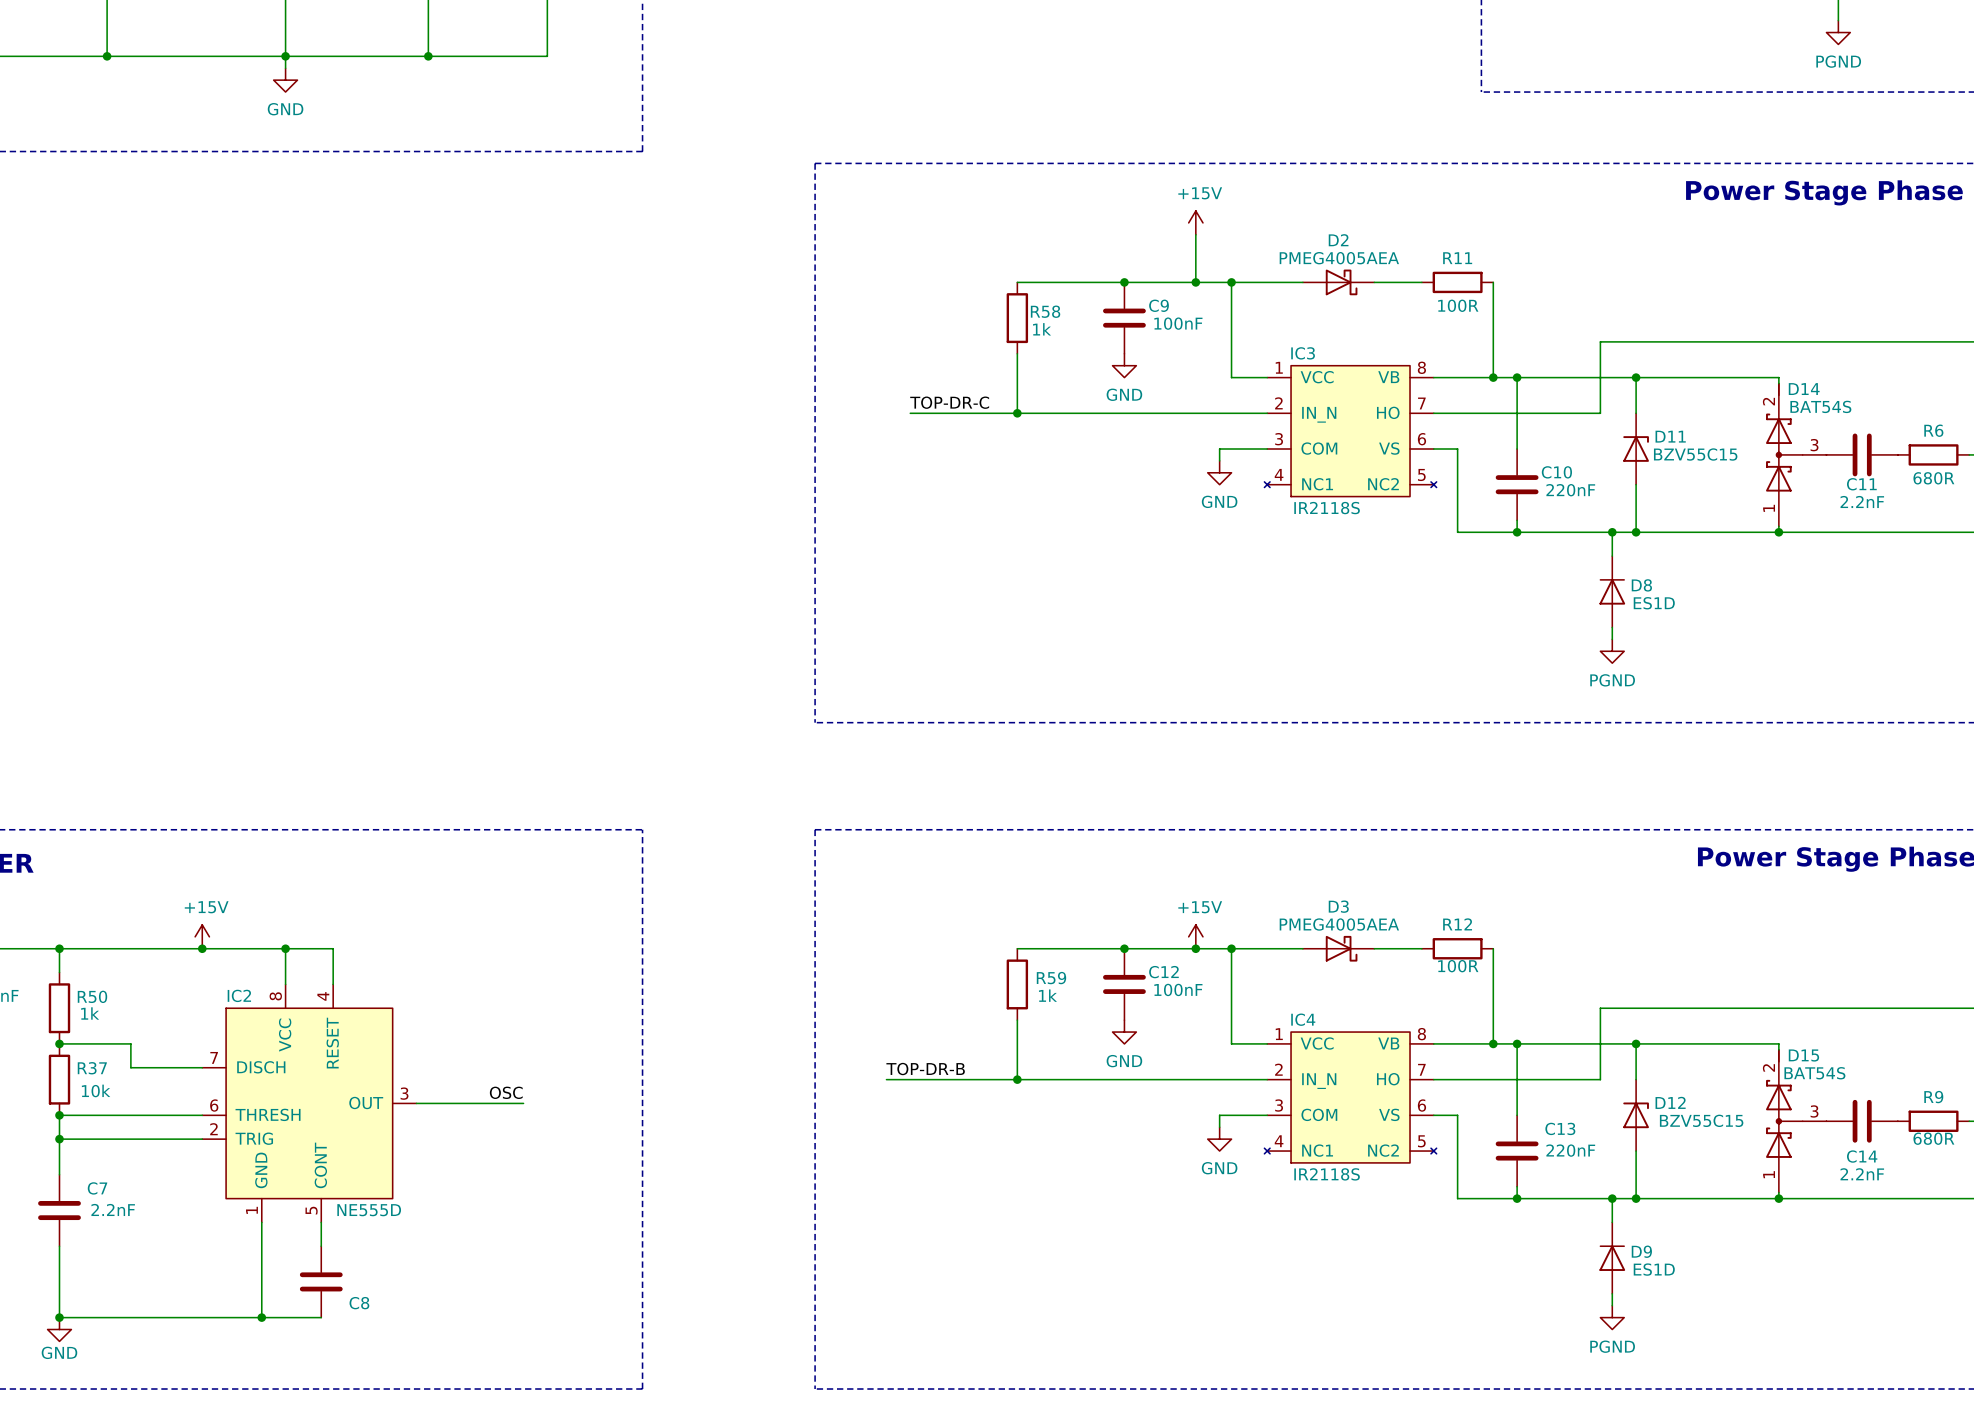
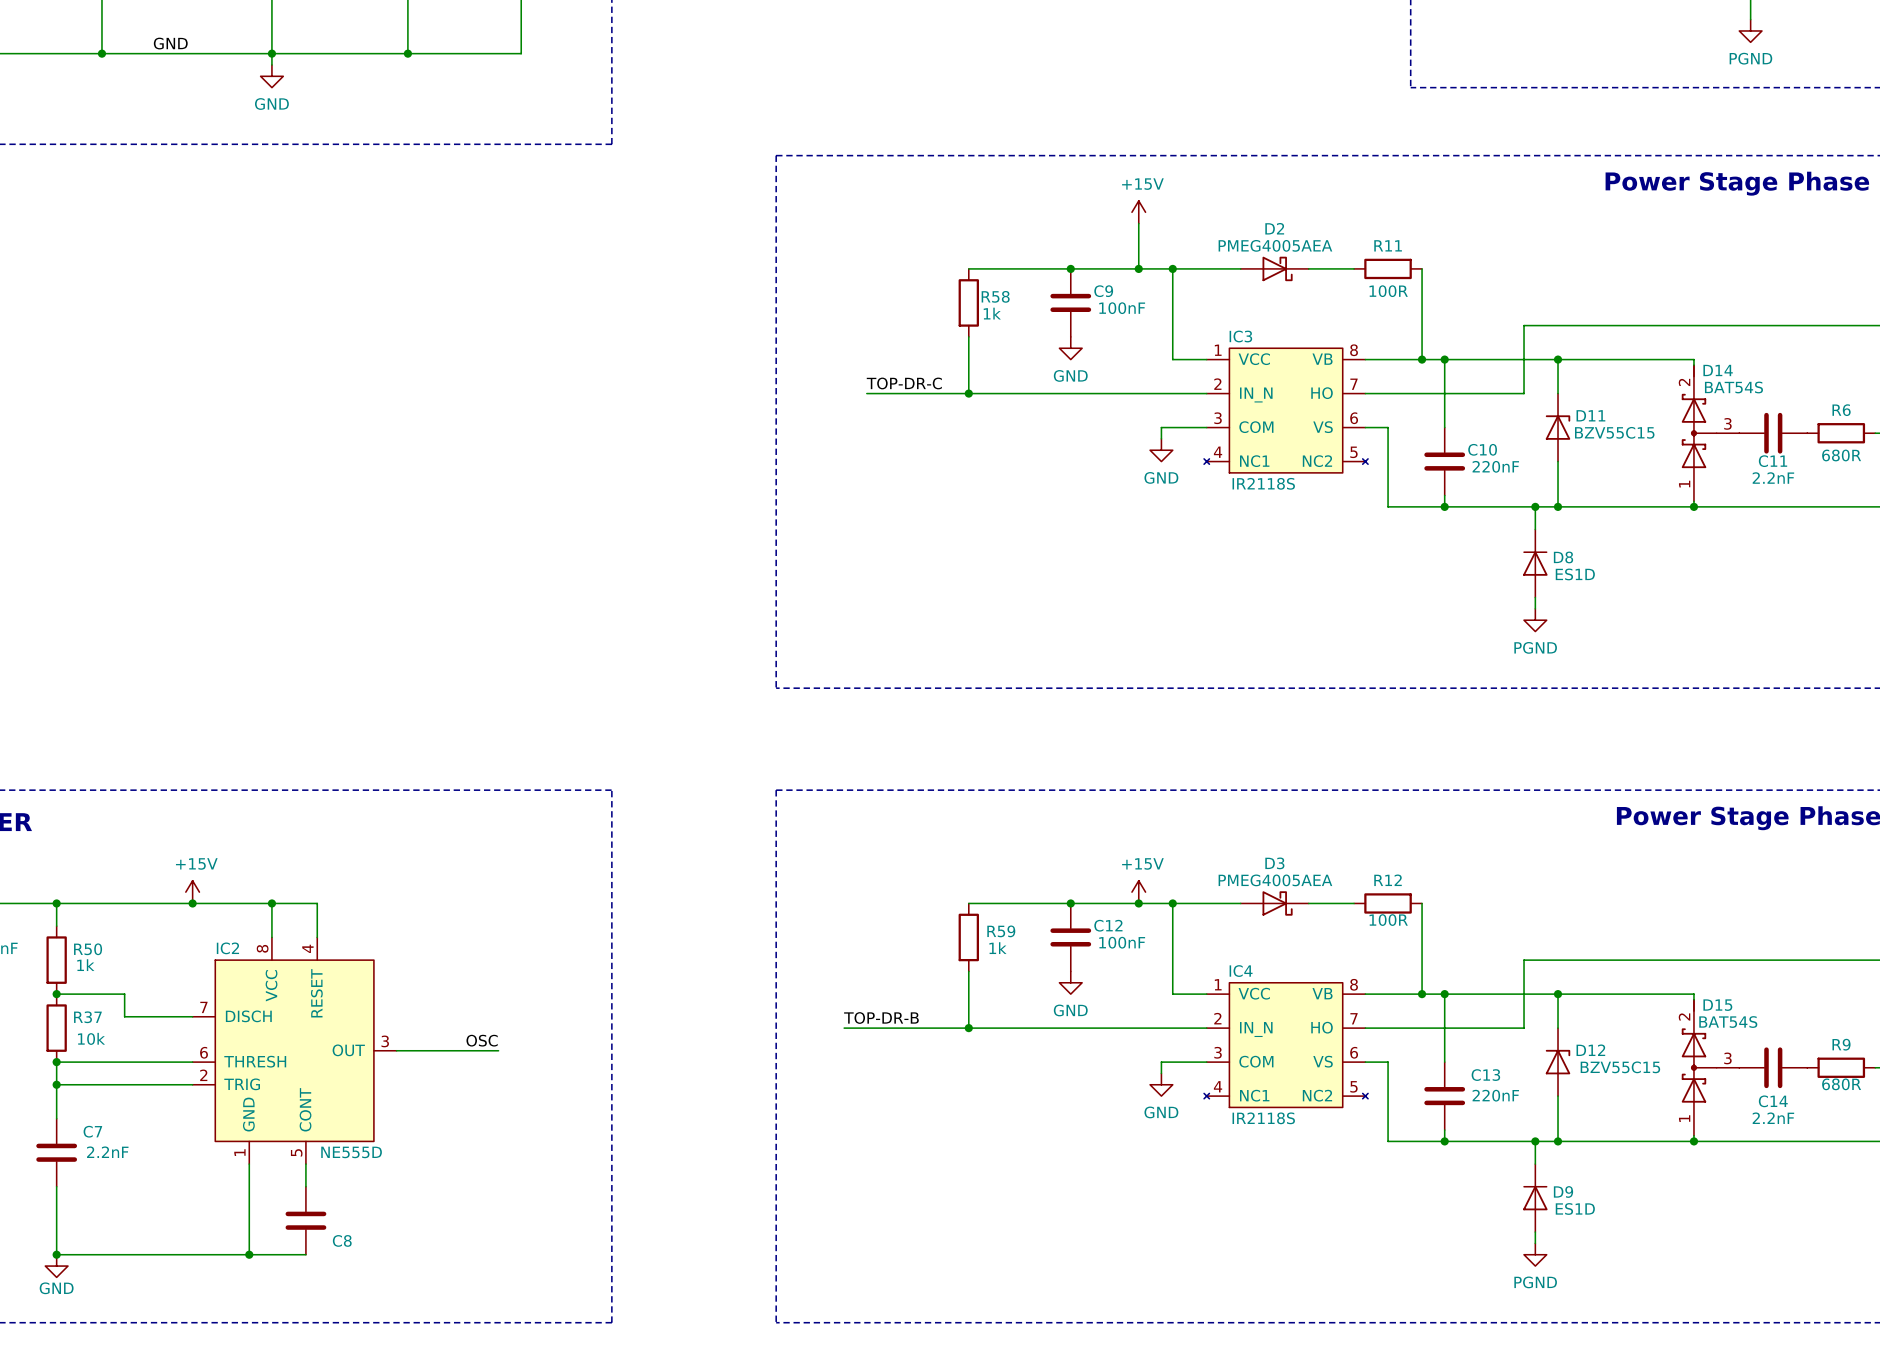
label: none -> GND (170, 43)

